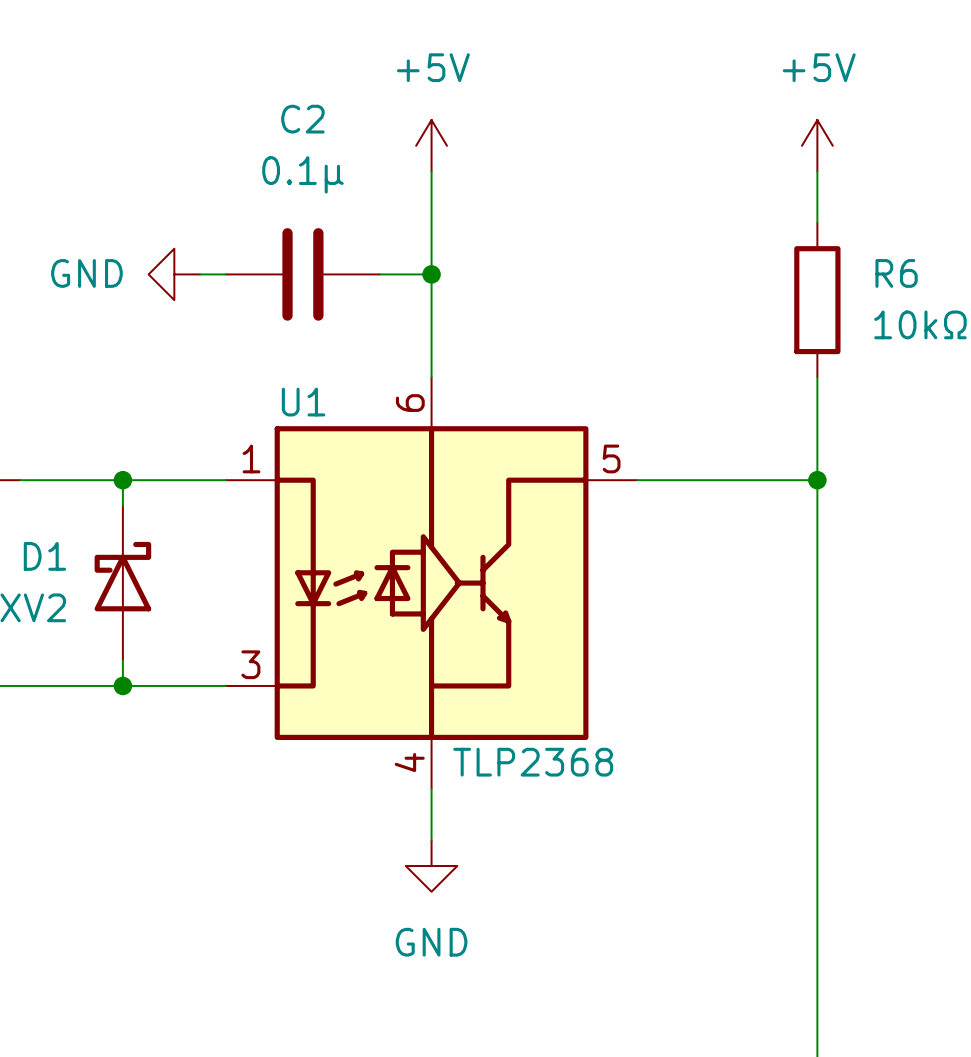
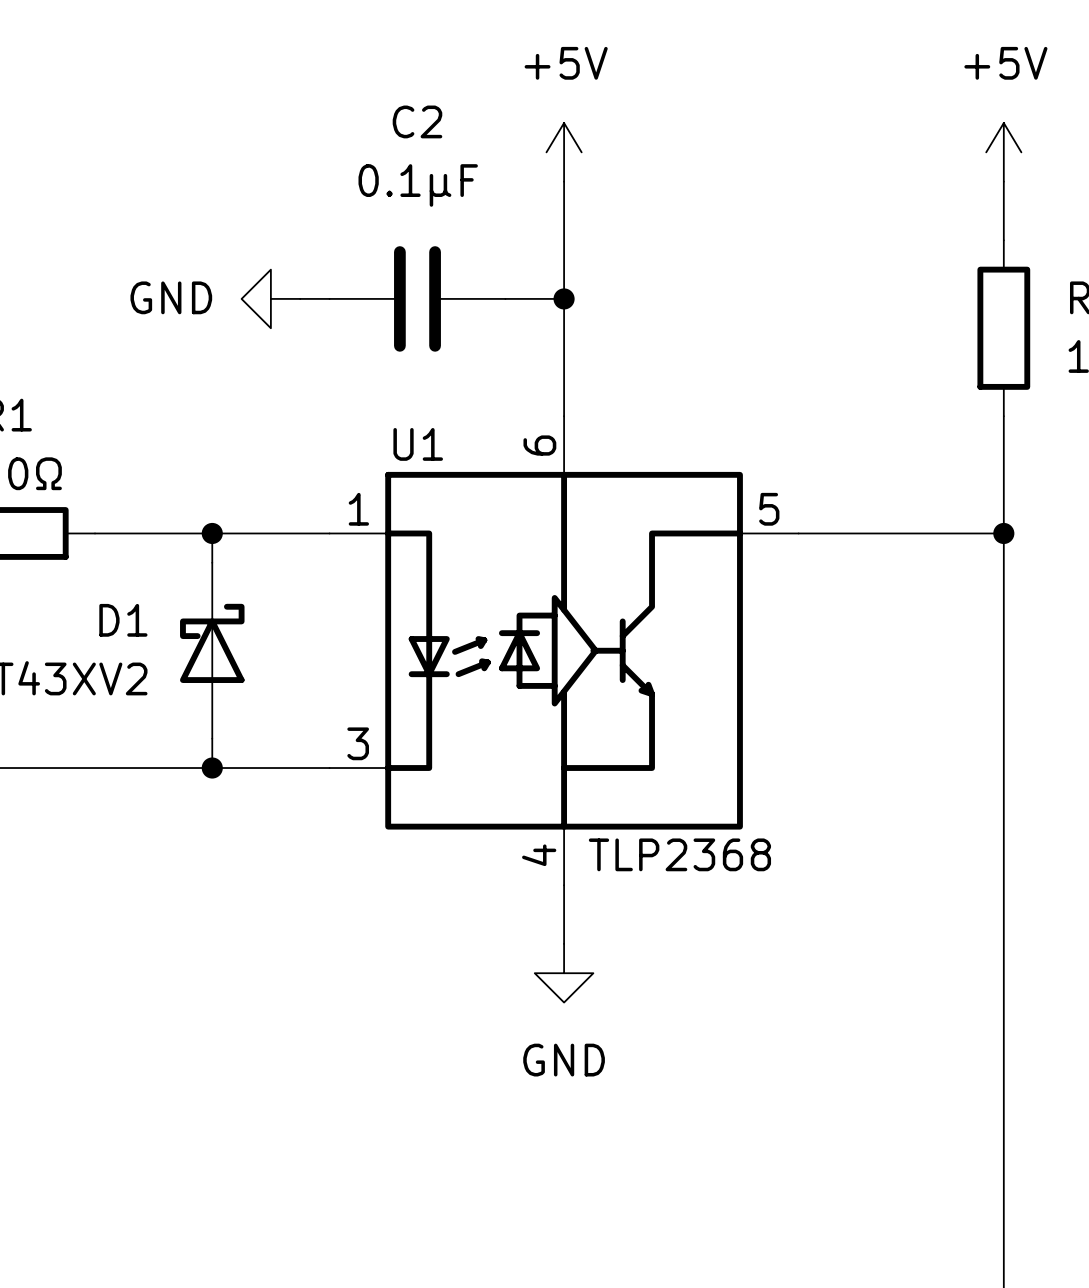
C2 value: 0.1μ (302, 174) -> 0.1μF (418, 185)

